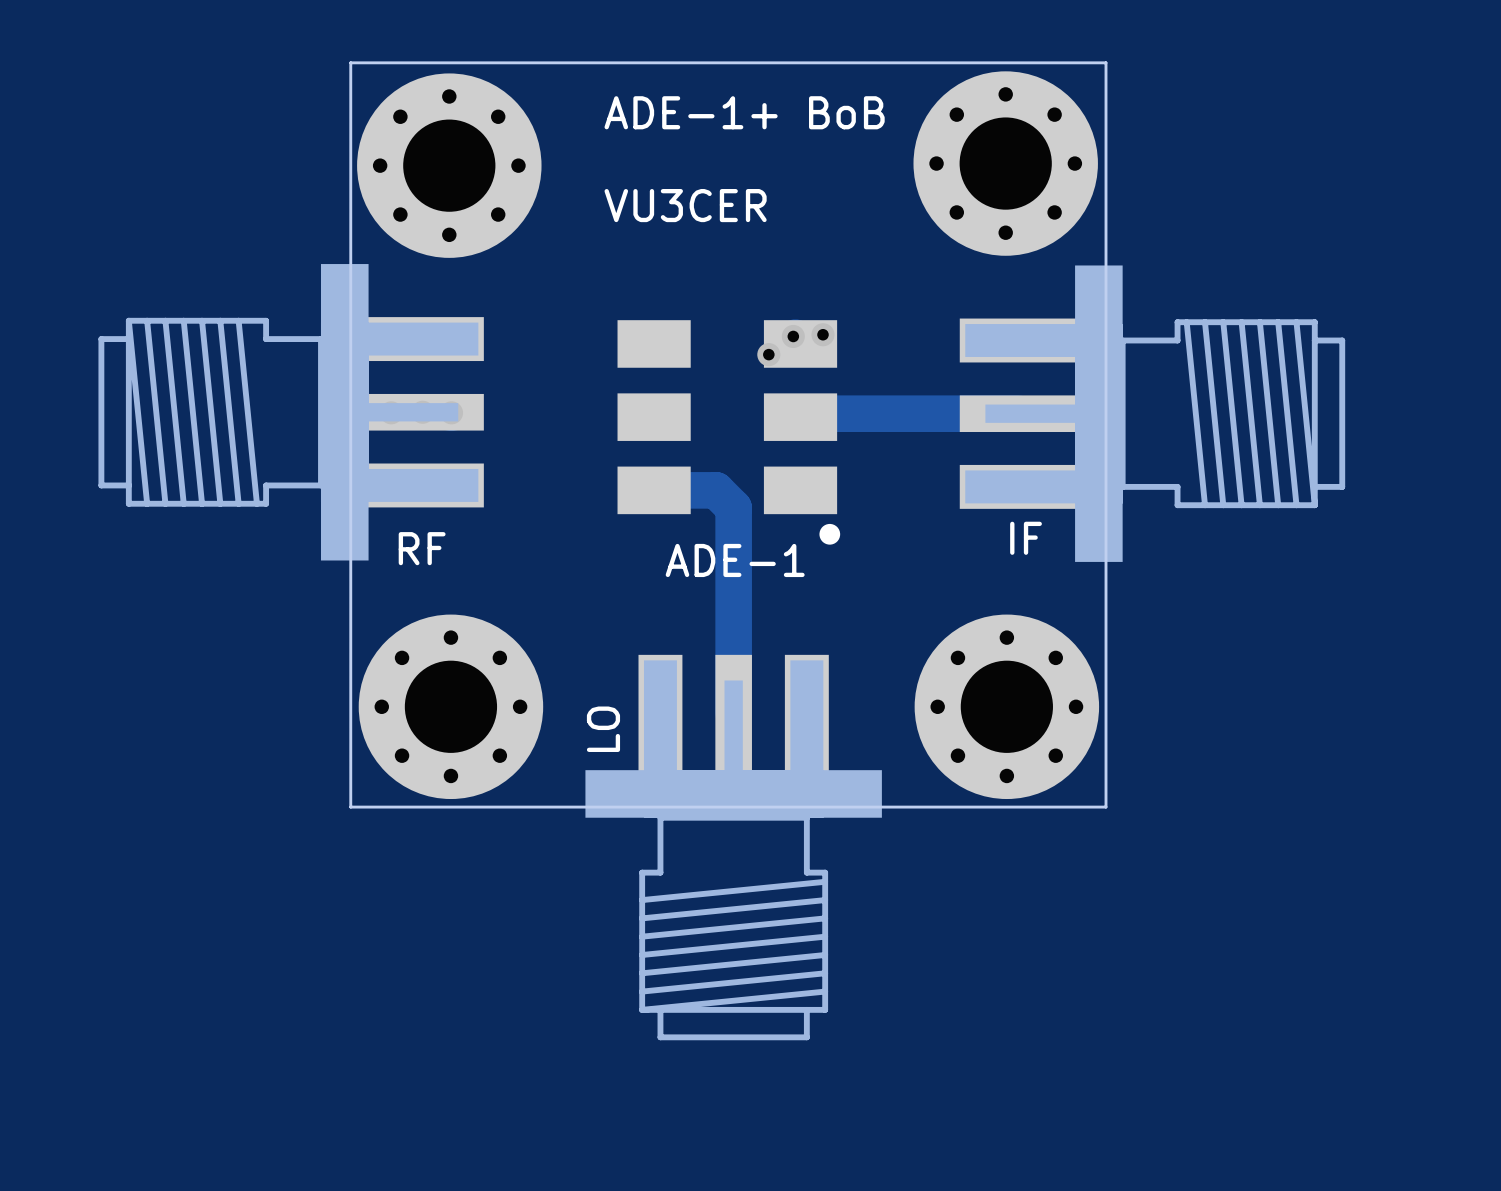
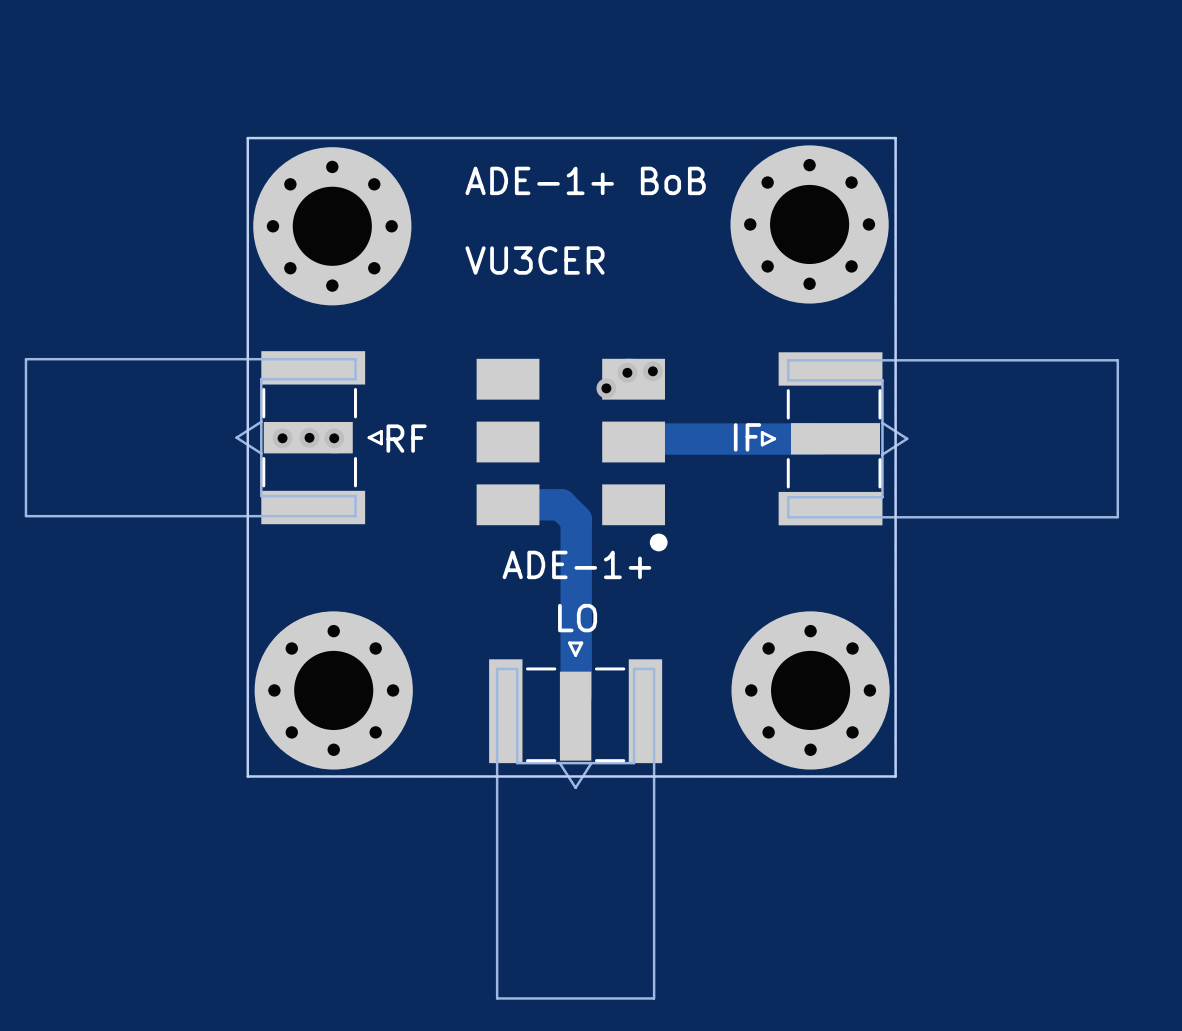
part footprint: [98, 264, 484, 561] -> [24, 351, 383, 525]
part footprint: [959, 265, 1346, 562] -> [760, 352, 1120, 526]
part value position: IF (1026, 538) -> IF (747, 437)
part value position: RF (422, 548) -> RF (406, 438)
part value: ADE-1 (735, 560) -> ADE-1+ (576, 564)
part footprint: [585, 654, 882, 1041] -> [489, 641, 663, 1000]
part value position: LO (603, 729) -> LO (577, 618)

